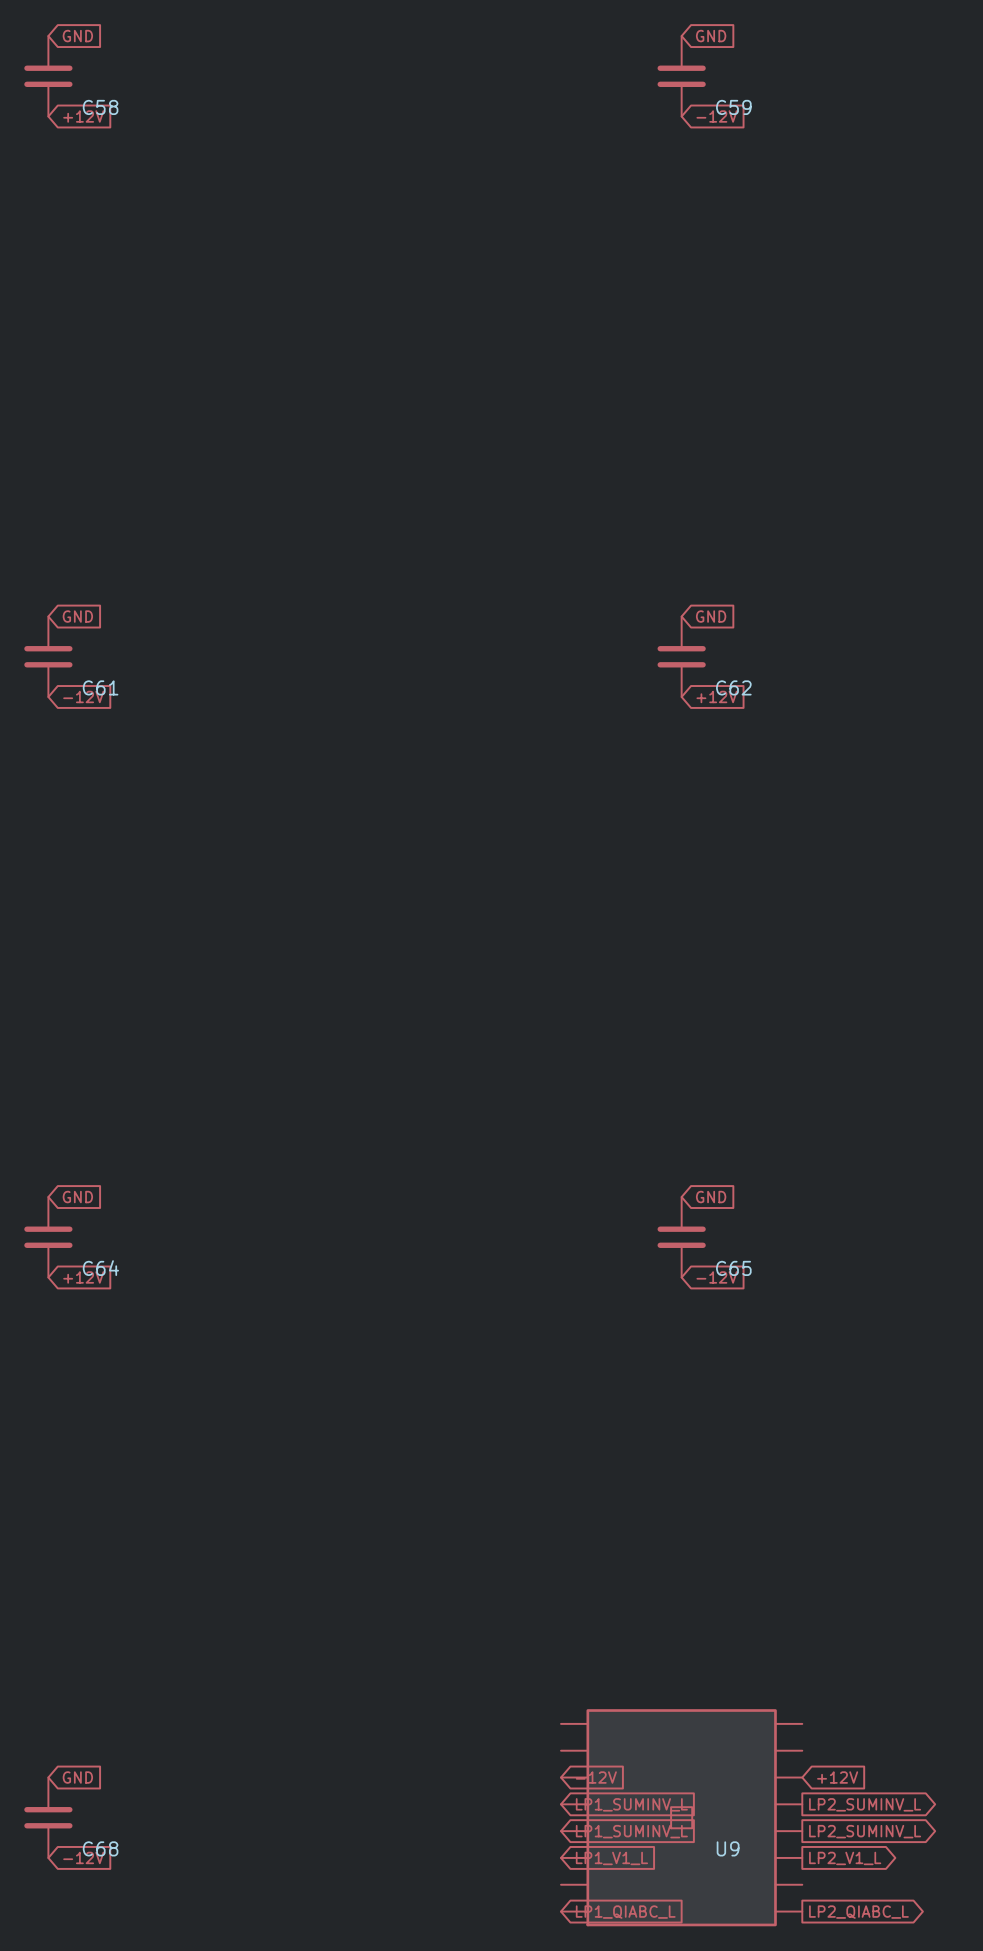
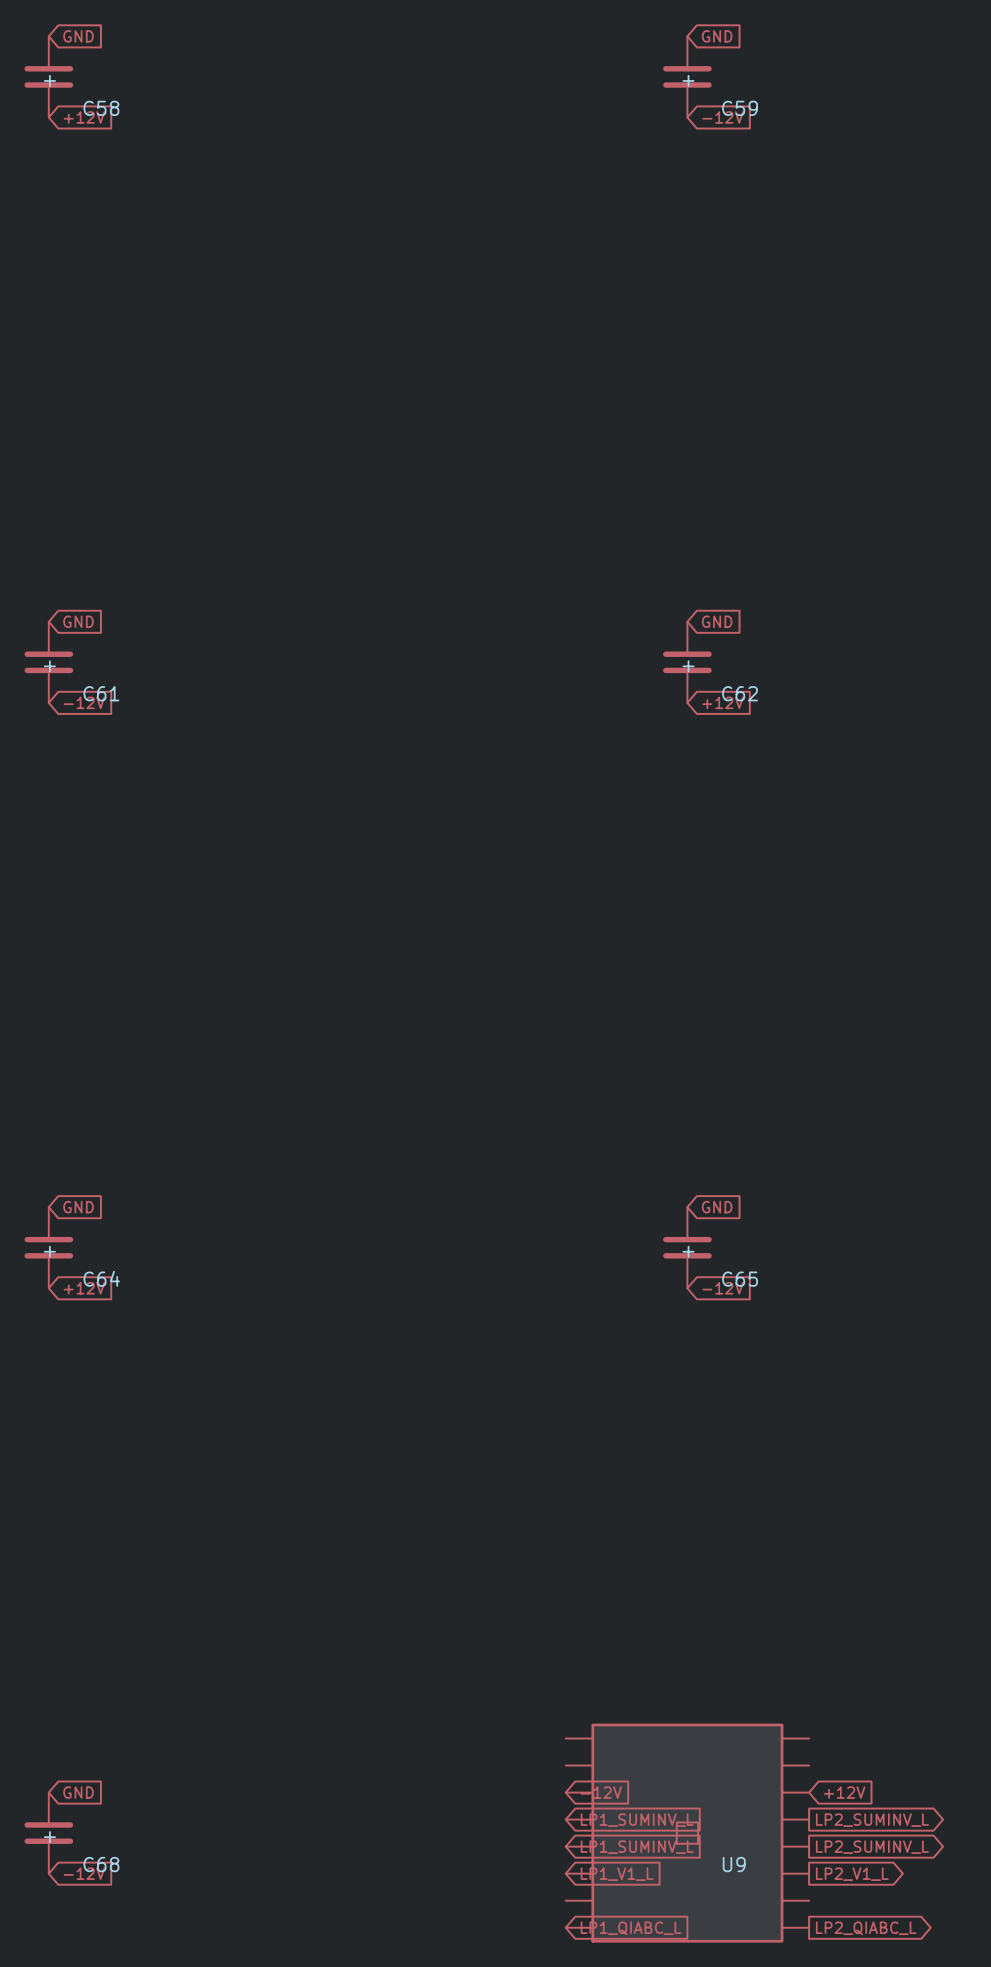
C58 pin name: none -> + (49, 80)
C59 pin name: none -> + (688, 80)
C61 pin name: none -> + (49, 666)
C62 pin name: none -> + (688, 666)
C64 pin name: none -> + (49, 1251)
C65 pin name: none -> + (688, 1251)
C68 pin name: none -> + (49, 1837)

